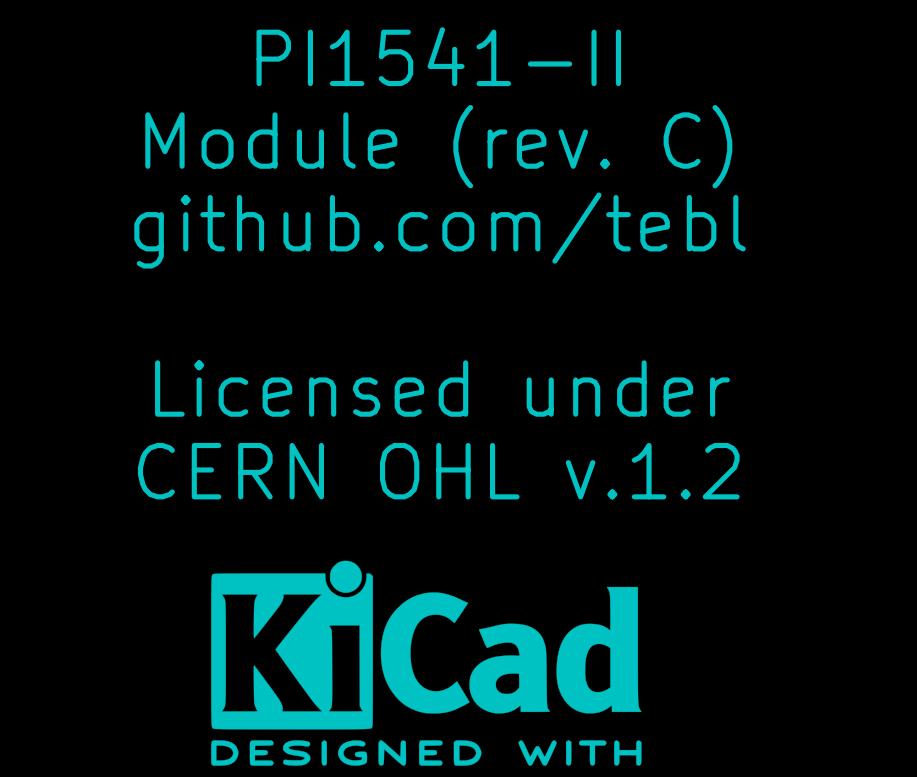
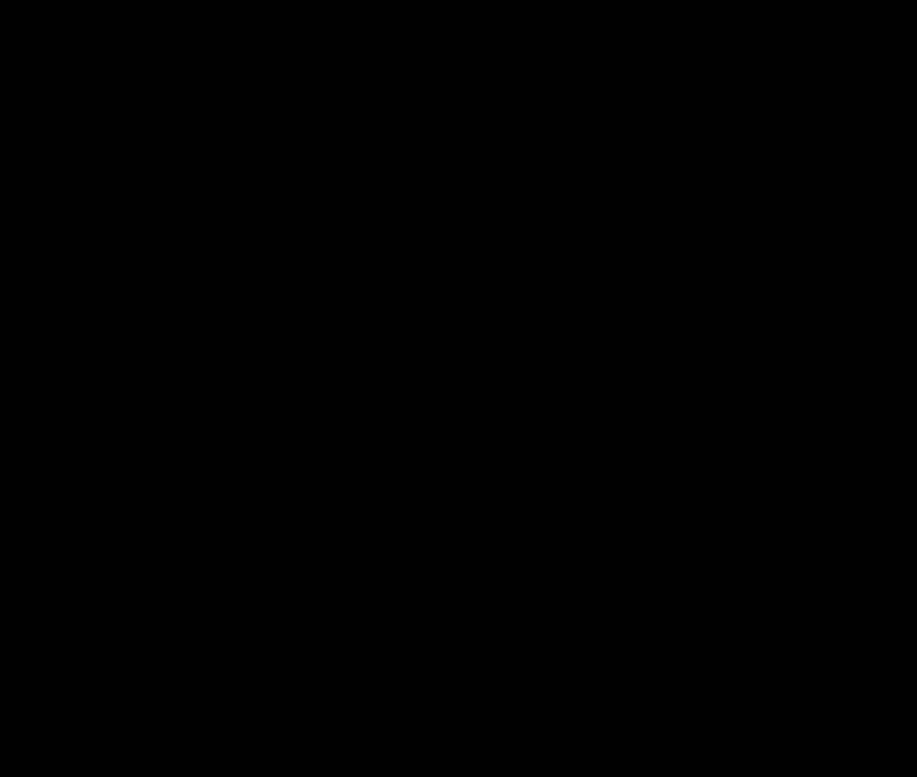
text: PI1541-II (438, 56) -> none
text: Module (rev. C) (438, 146) -> none
text: github.com/tebl (440, 230) -> none
text: Licensed under (442, 388) -> none
text: CERN OHL v.1.2 (438, 471) -> none
drawing: [211, 560, 642, 766] -> none

